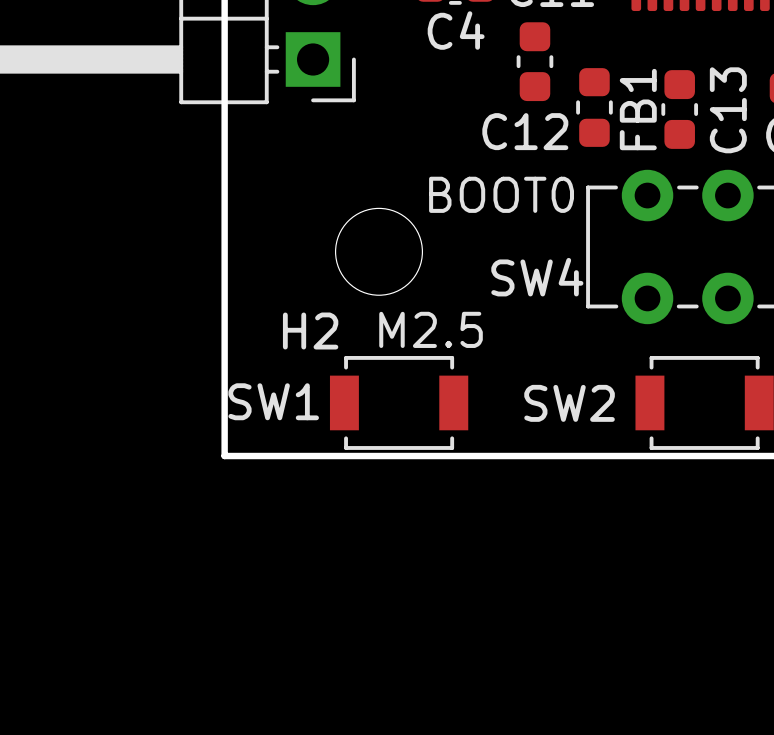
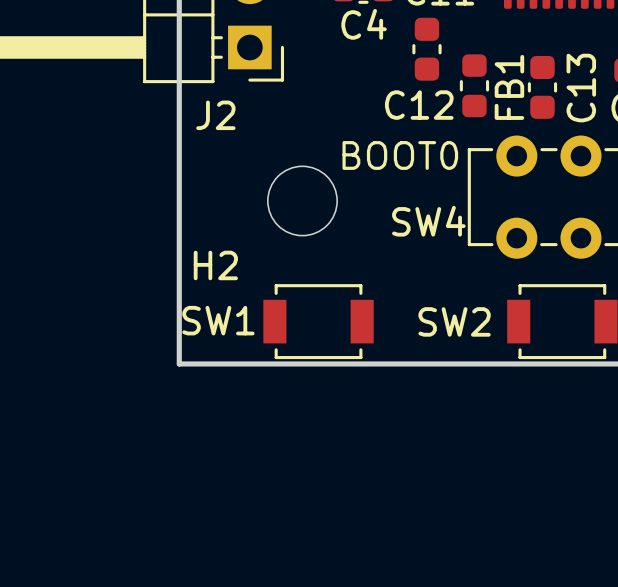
J2 name: none -> J2 (215, 115)
text: M2.5 (431, 329) -> none
H2 name position: H2 (310, 331) -> H2 (215, 265)

